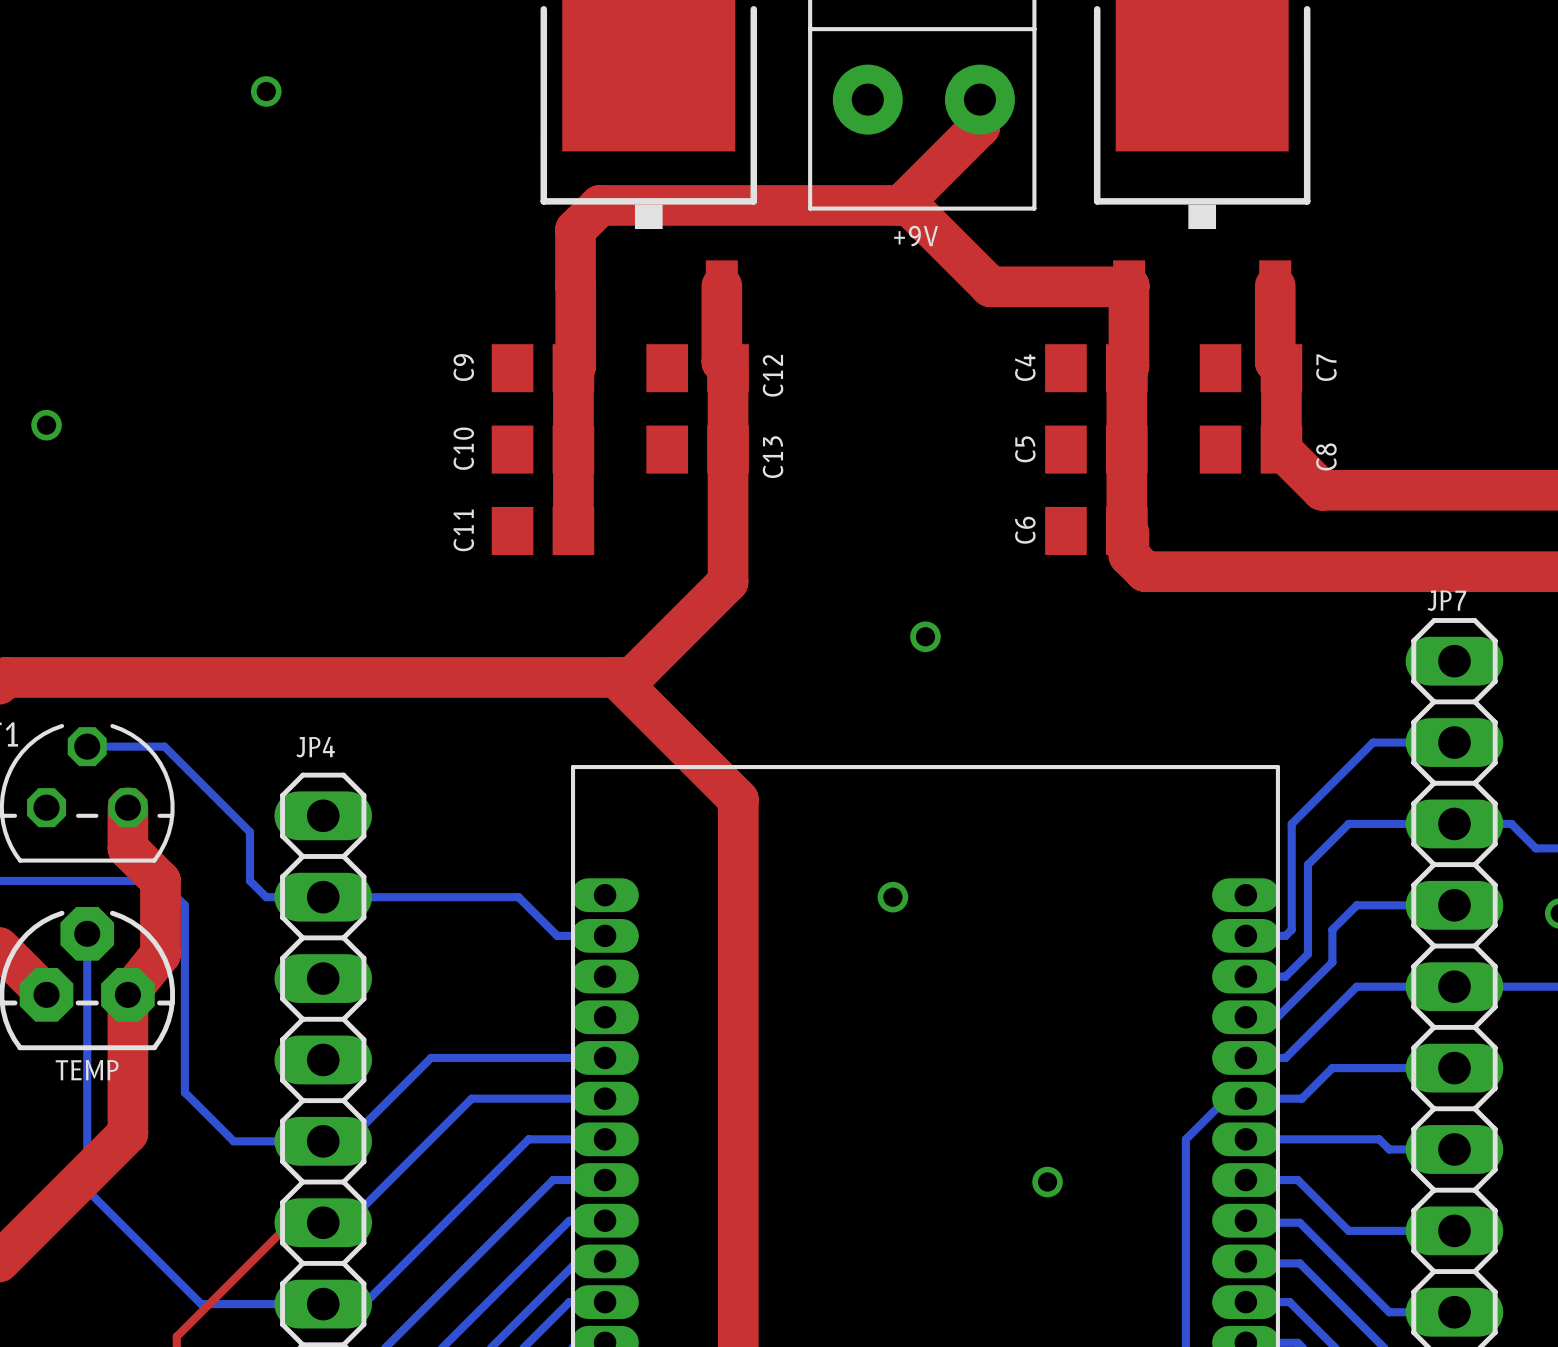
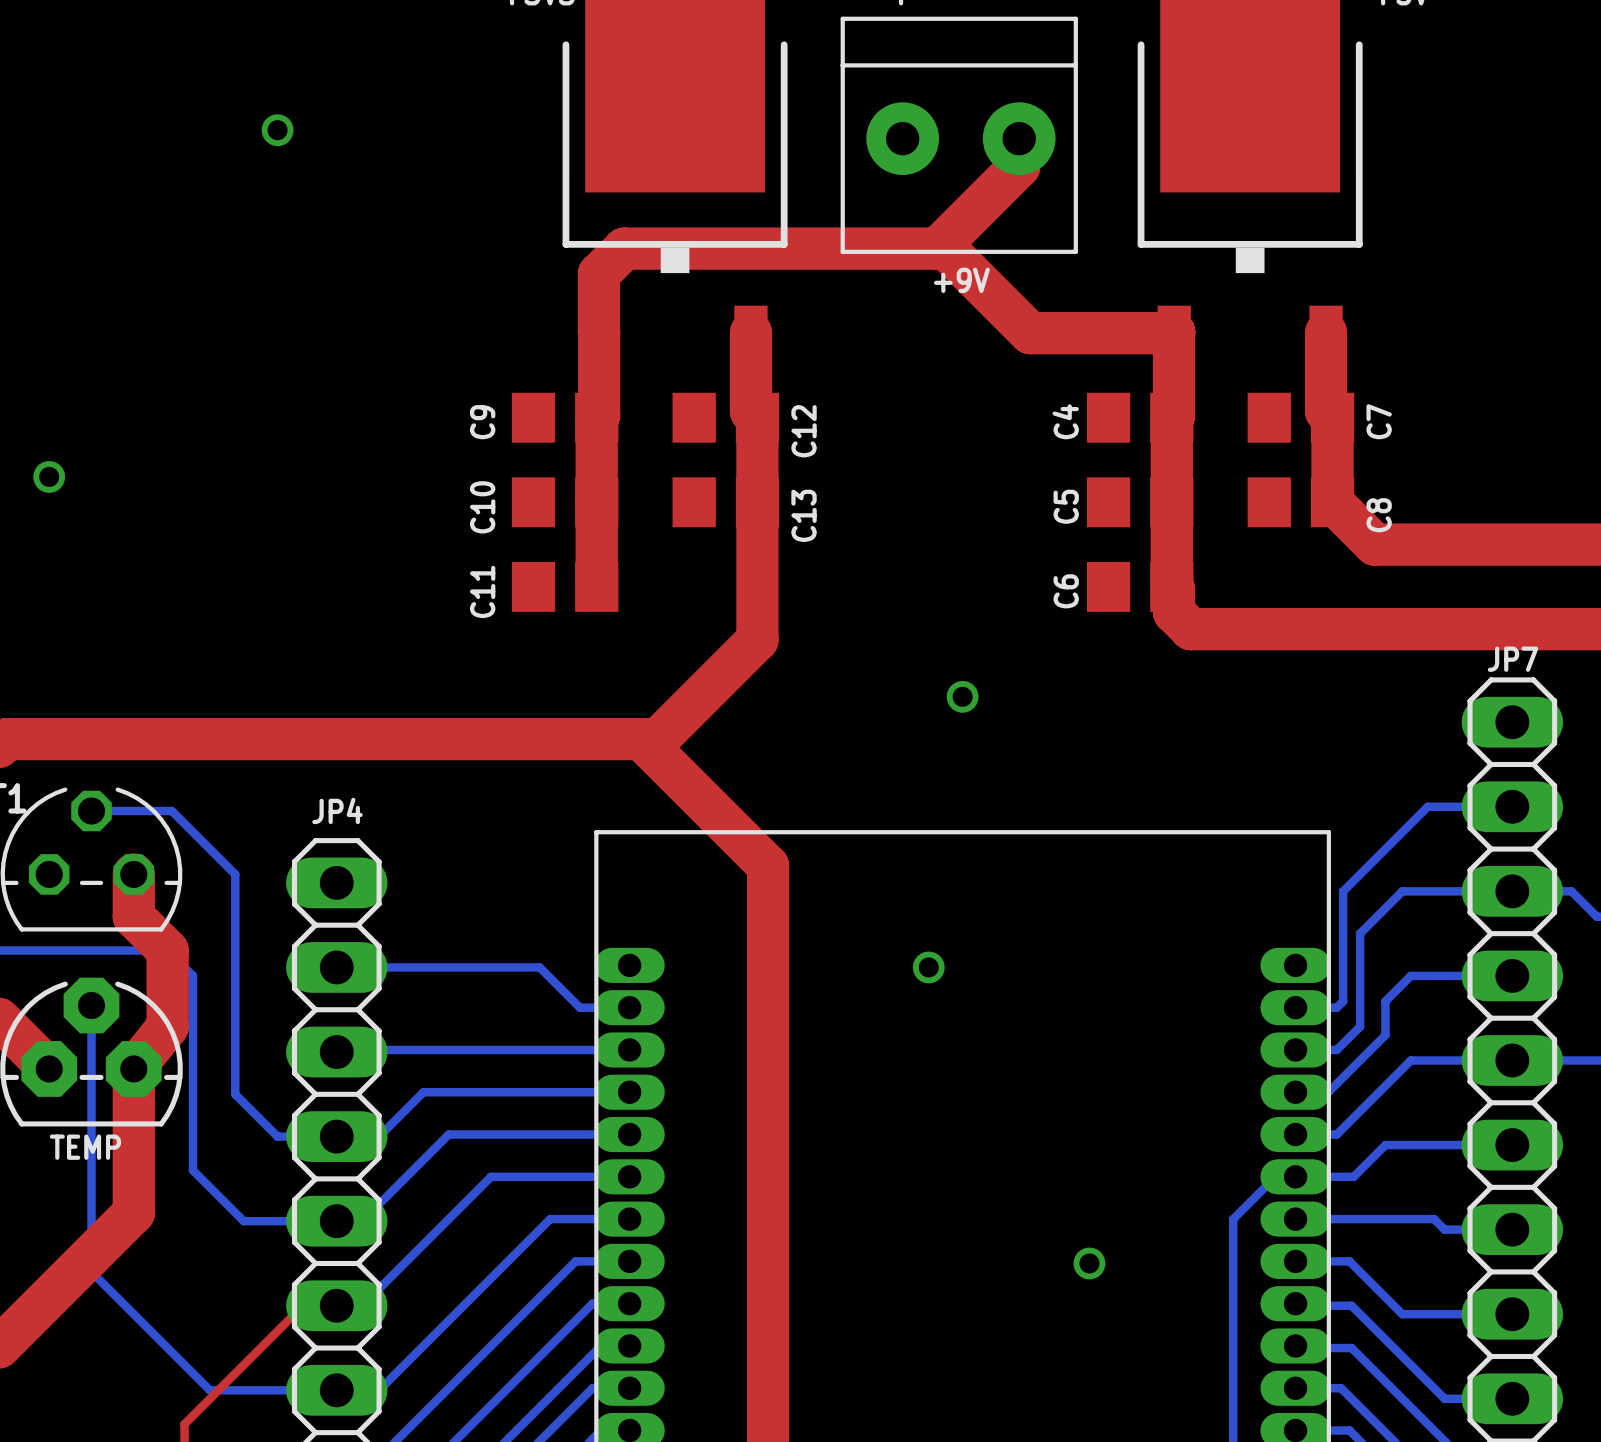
bottom track: (225, 807) (250, 832) (250, 880) (266, 897) (323, 897) -> (235, 874) (235, 1094) (277, 1136) (379, 1136) (423, 1092) (629, 1092)
bottom track: none -> (629, 1049) (338, 1049) (336, 1052)

